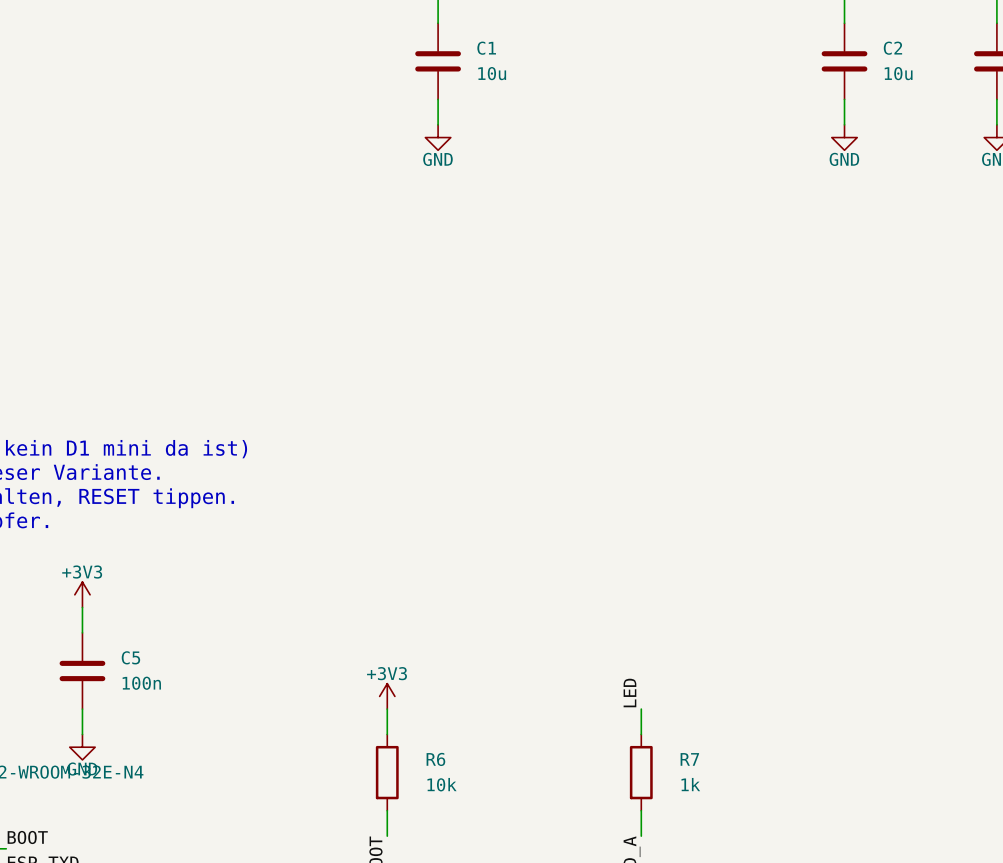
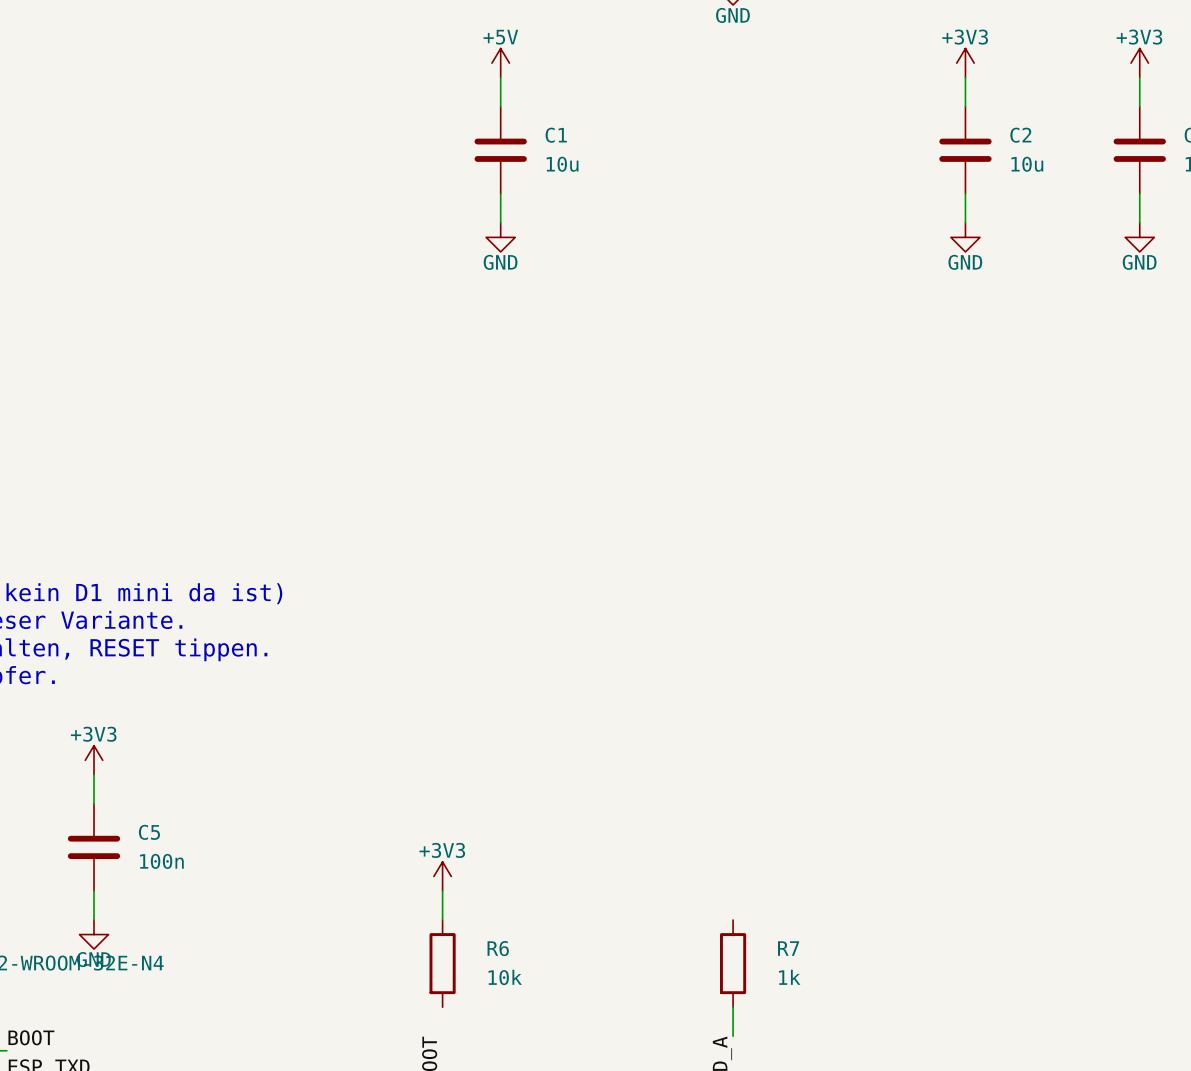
label: LED (629, 693) -> none
wire: (641, 709) (641, 734) -> none
wire: (387, 810) (387, 836) -> none

